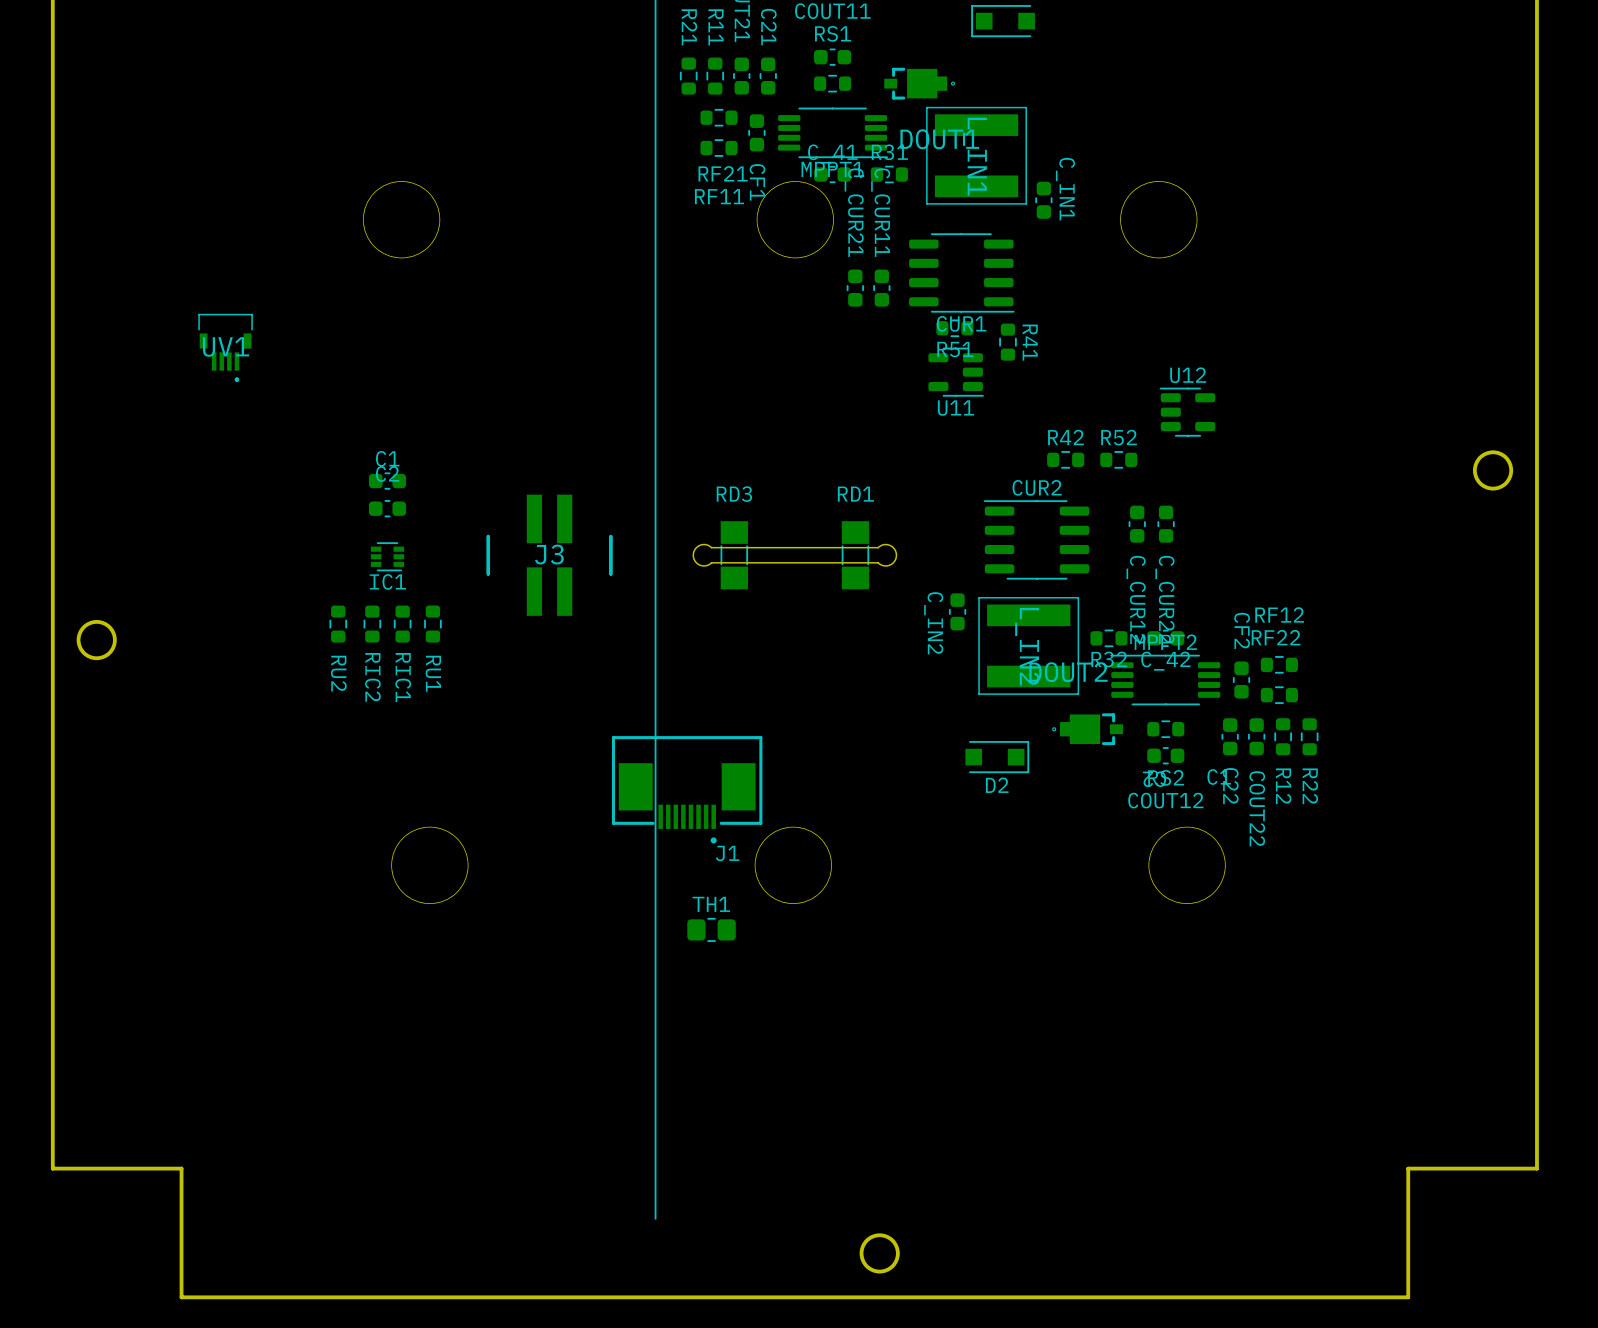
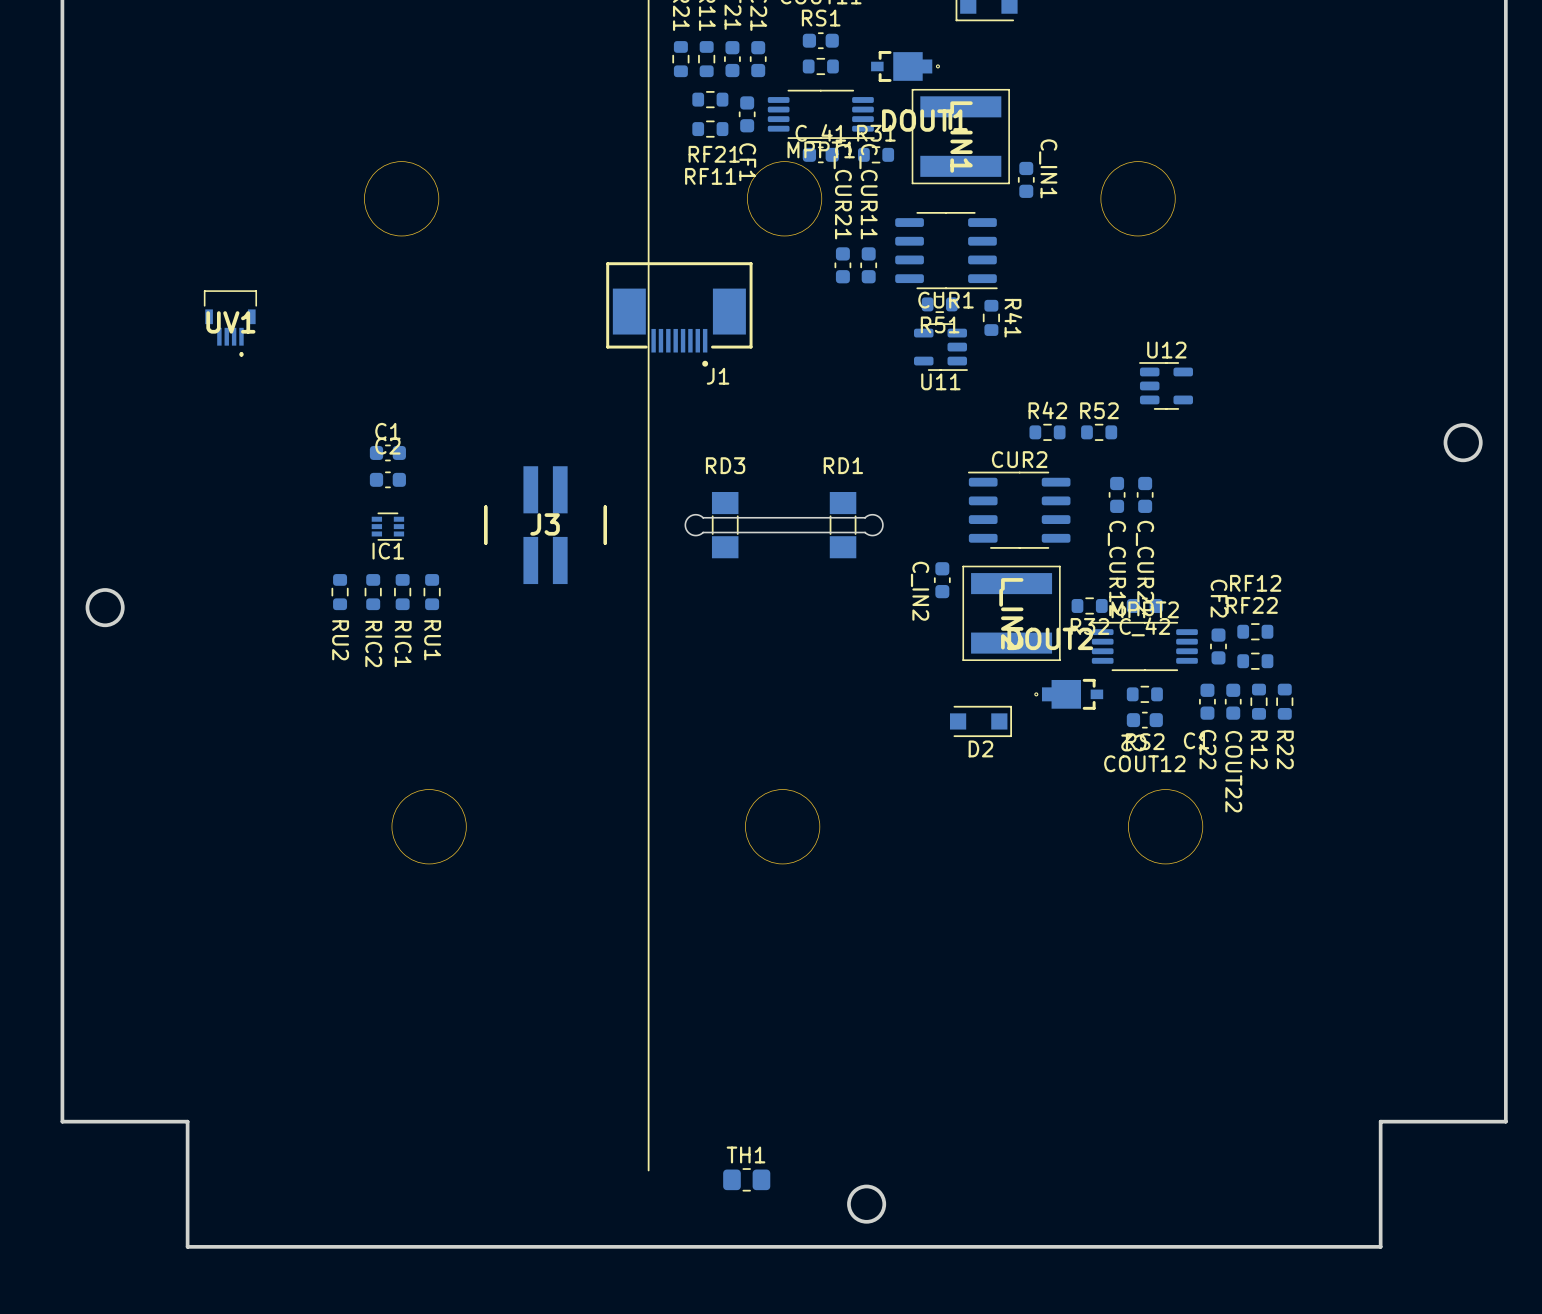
J1 position: (687, 789) -> (679, 314)
TH1 position: (711, 929) -> (746, 1179)

